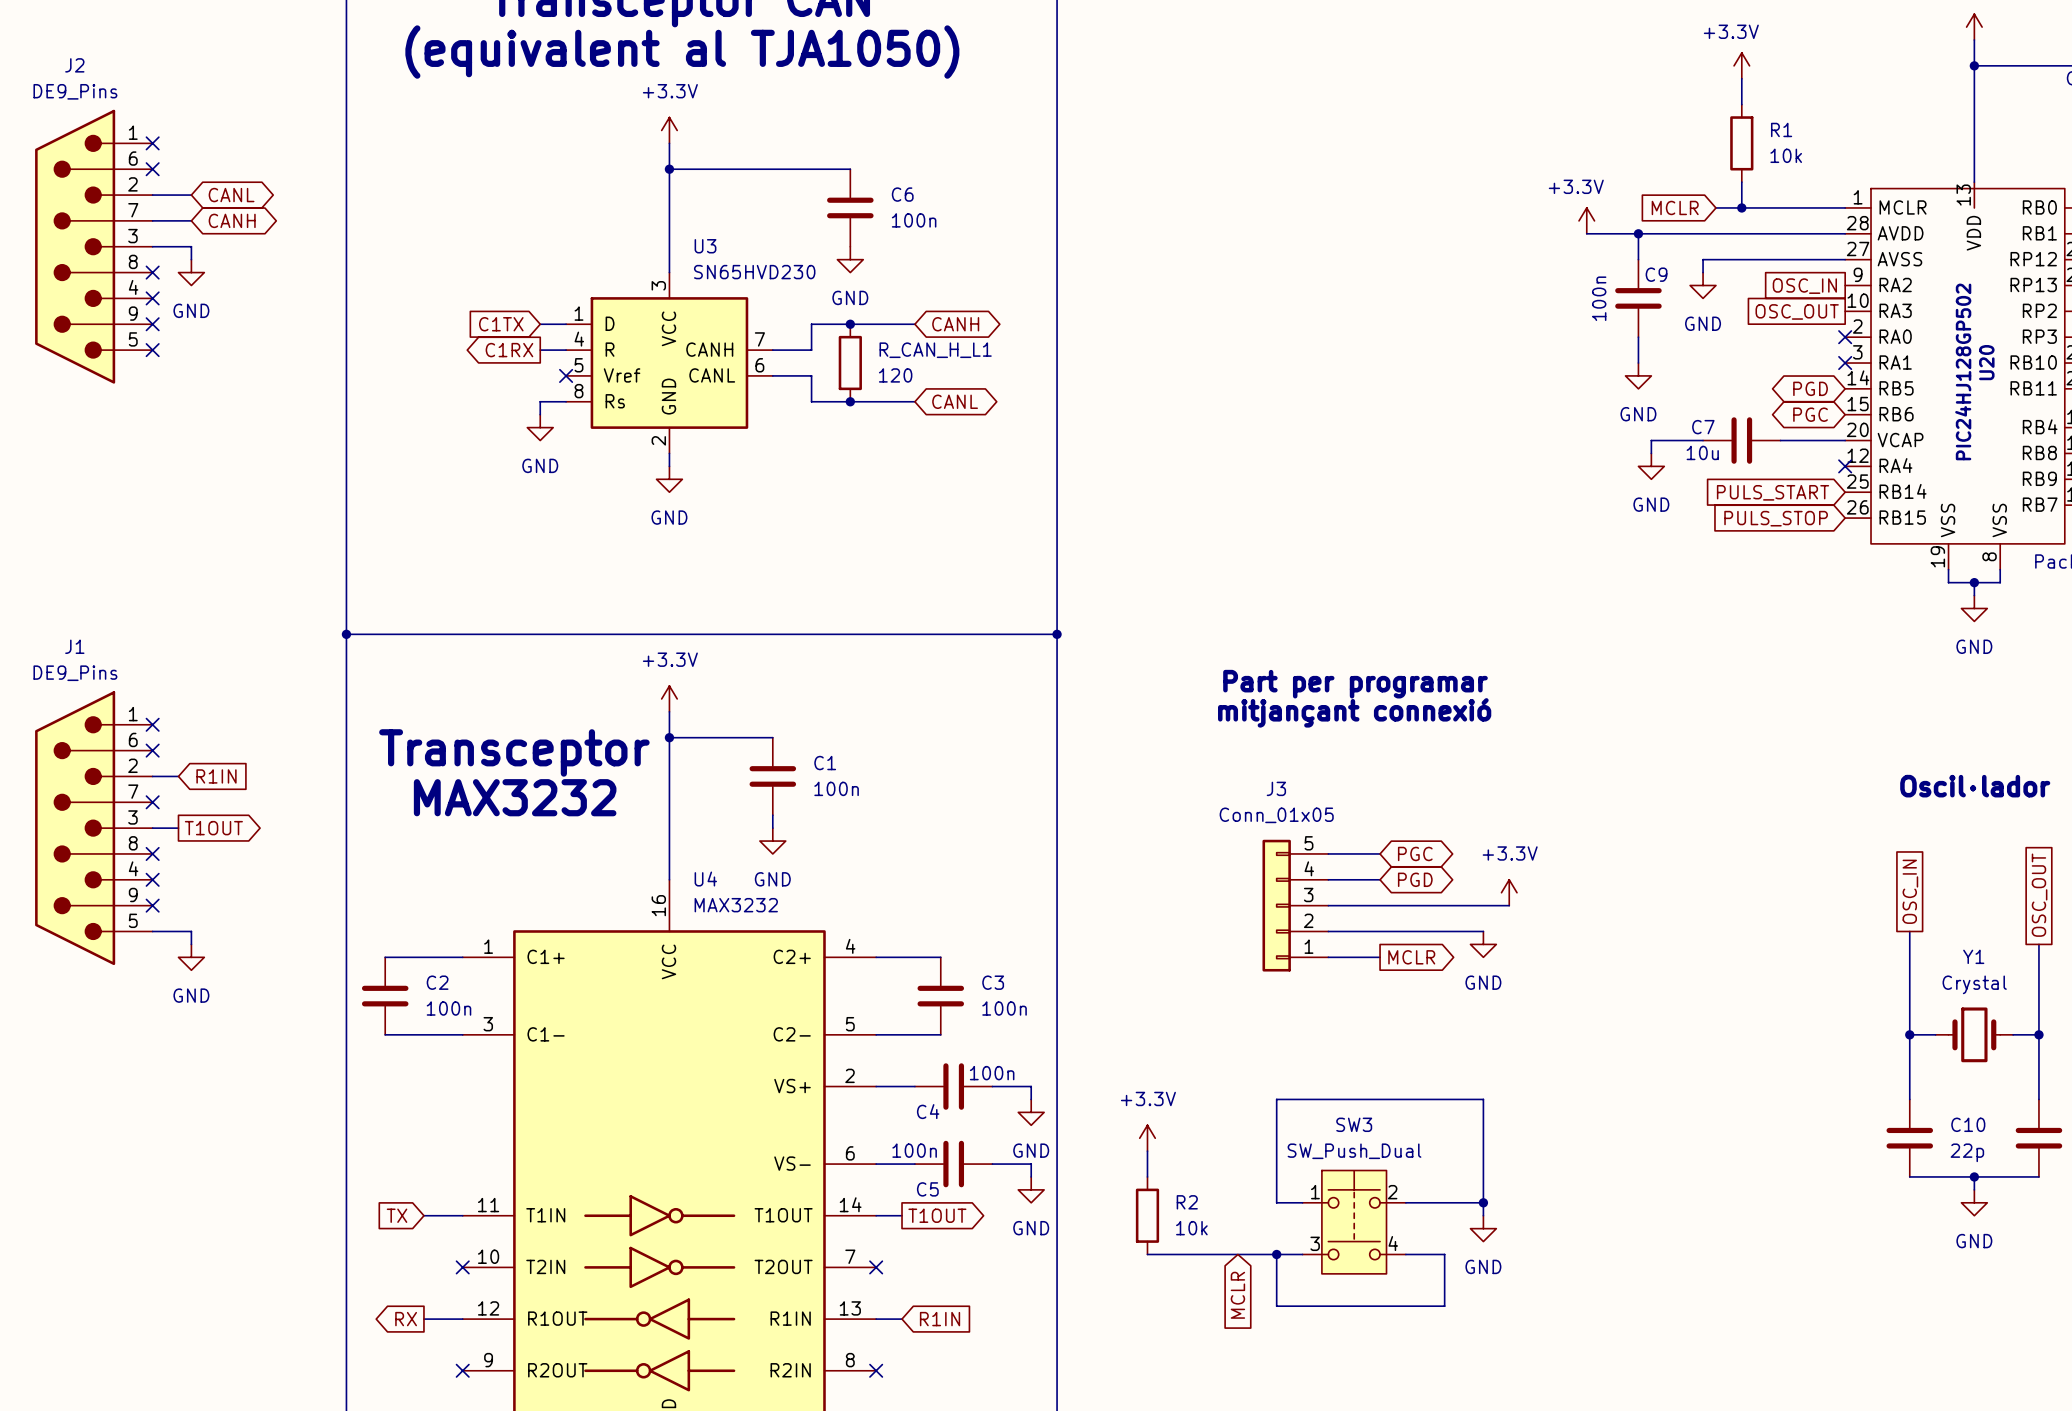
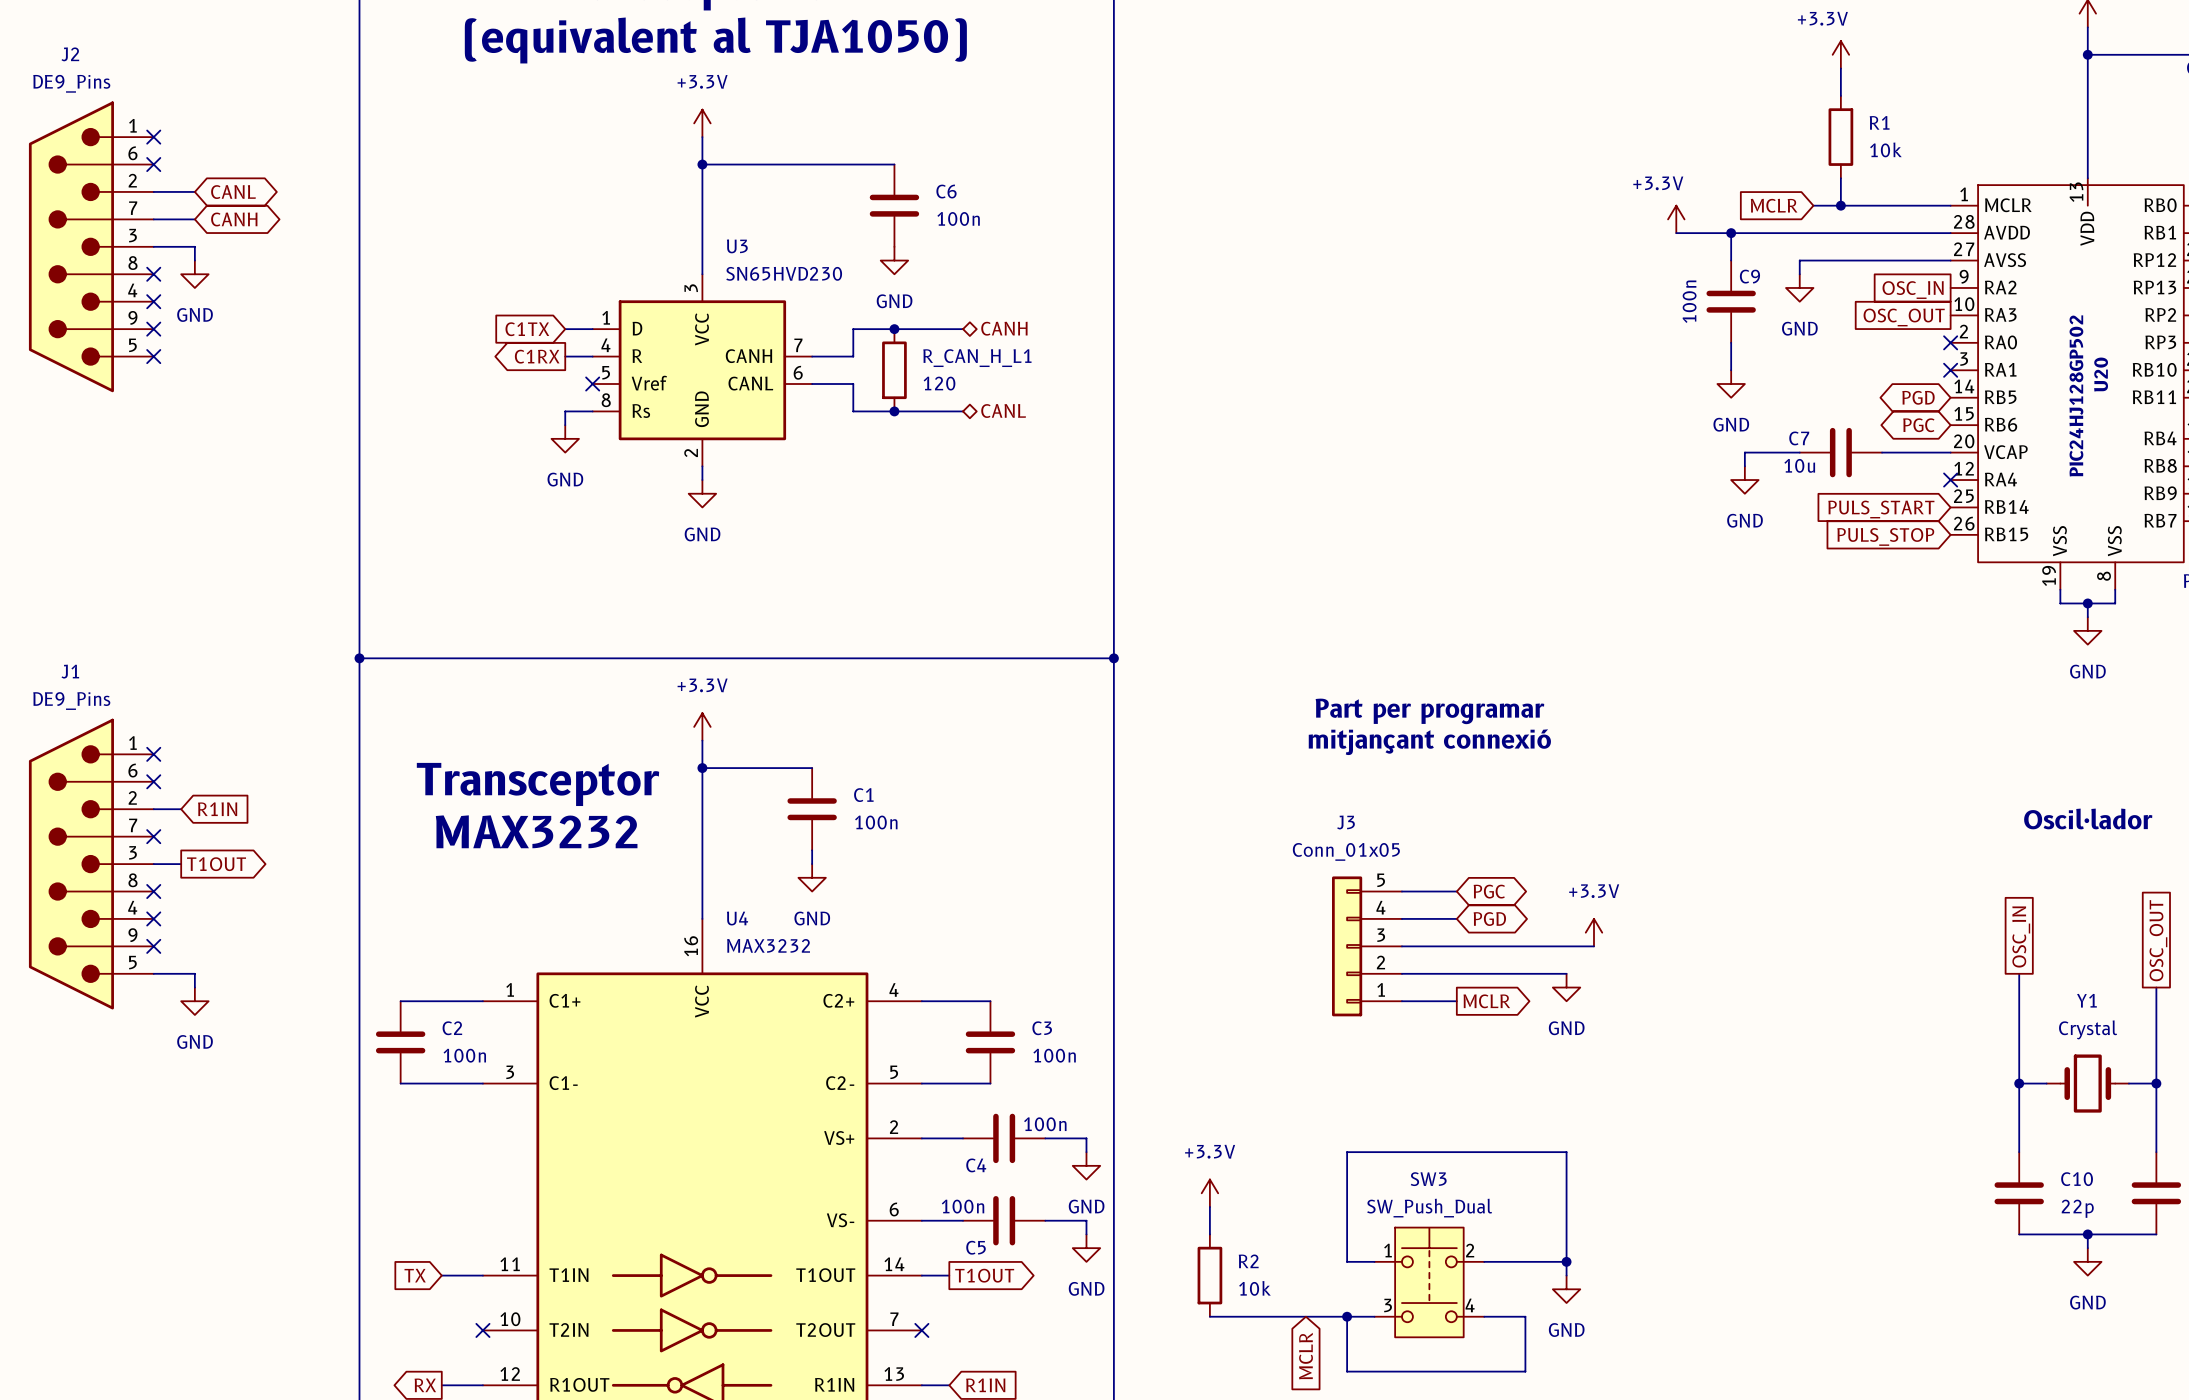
hierarchical label: none -> CANH (1004, 328)
global label: CANH (955, 324) -> none
global label: CANL (955, 401) -> none
hierarchical label: none -> CANL (1003, 410)

